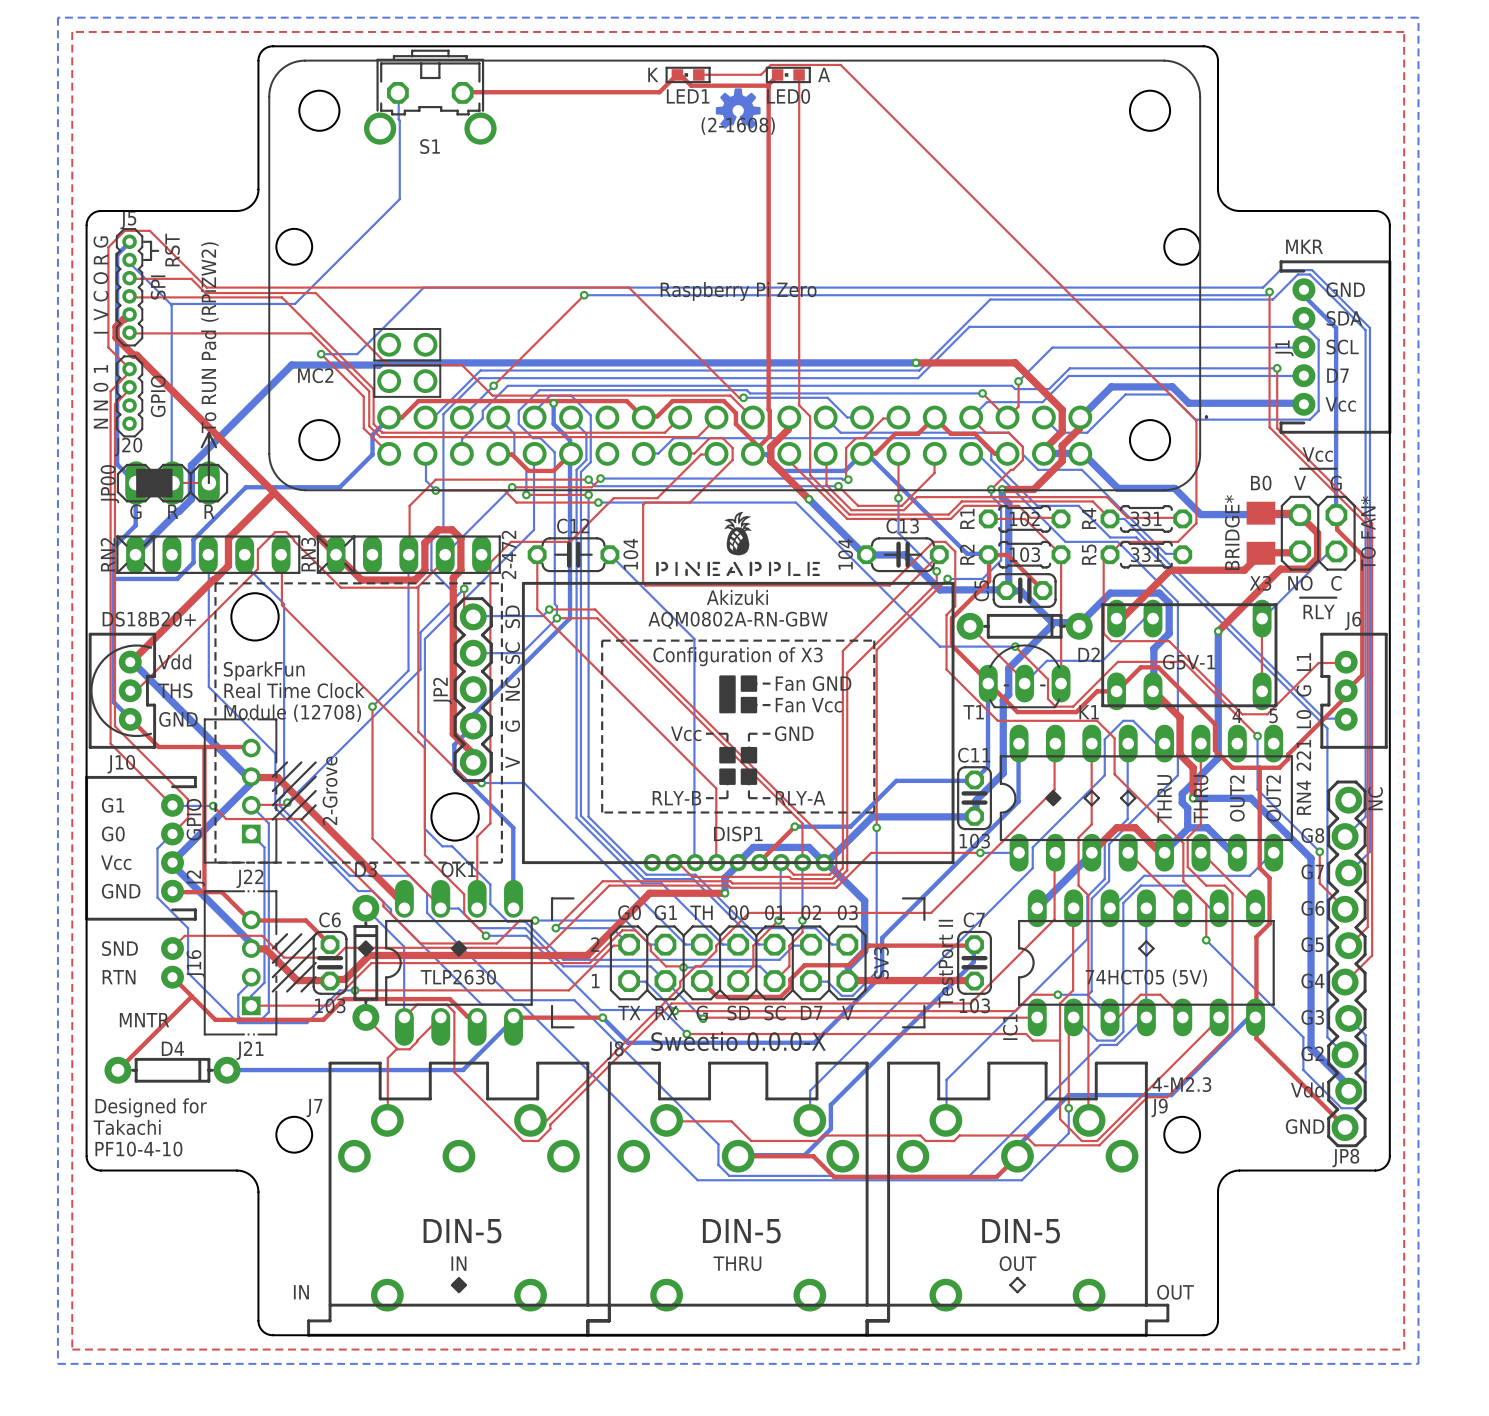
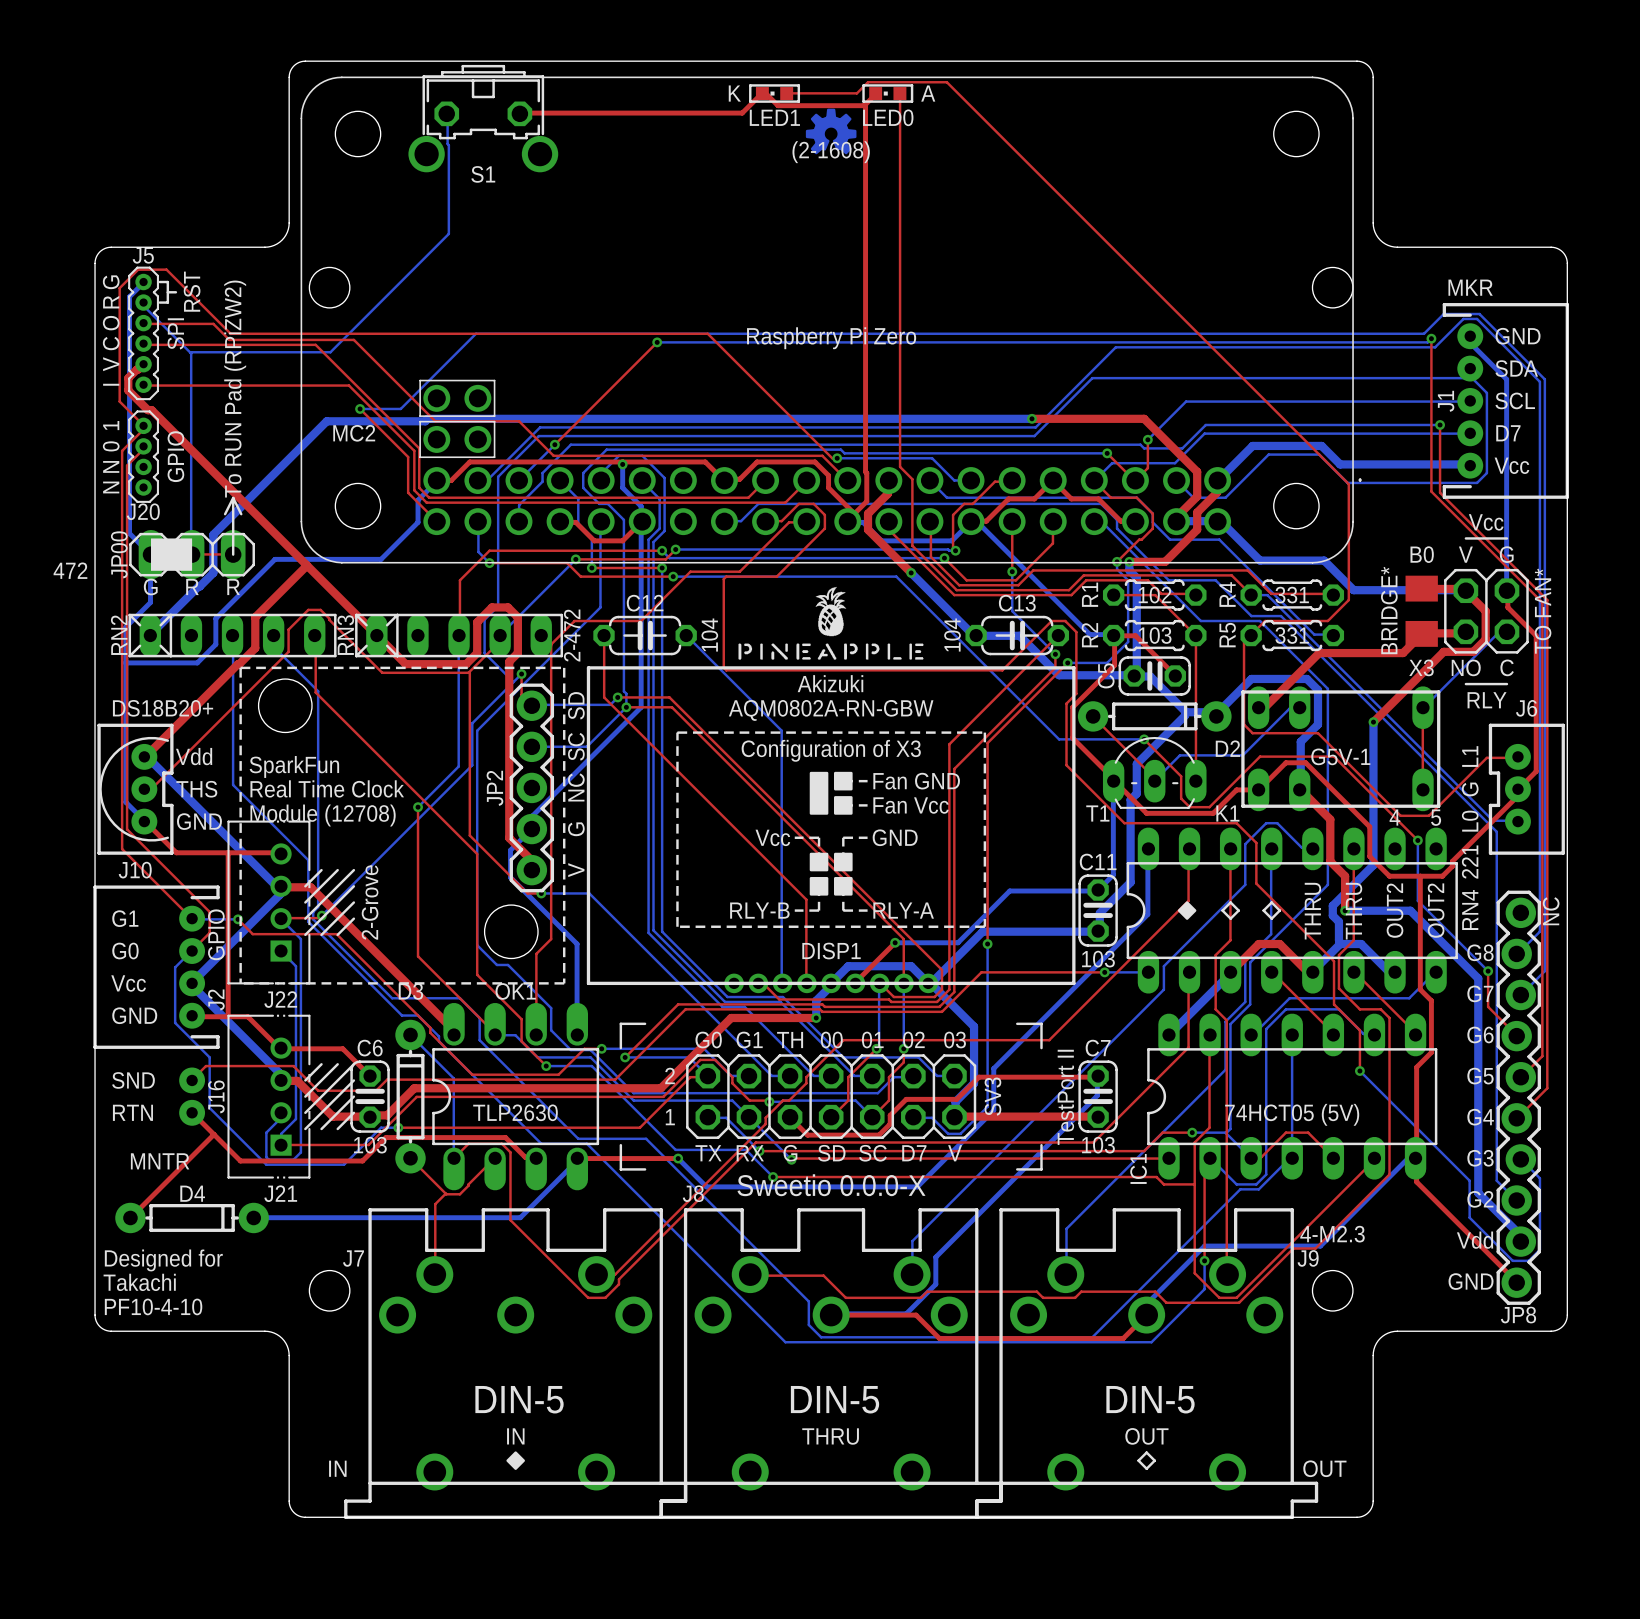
bottom zone outline: (57, 17) (1418, 17) (1418, 1363) (57, 1363) (57, 17) -> none
top zone outline: (72, 31) (1404, 31) (1404, 1349) (72, 1349) (72, 31) -> none
text: none -> 472 (70, 570)
drawing: [357, 940, 375, 957] -> none
drawing: [450, 940, 468, 957] -> none
line: (1146, 941) (1139, 948) (1146, 955) (1153, 948) (1146, 941) -> none

